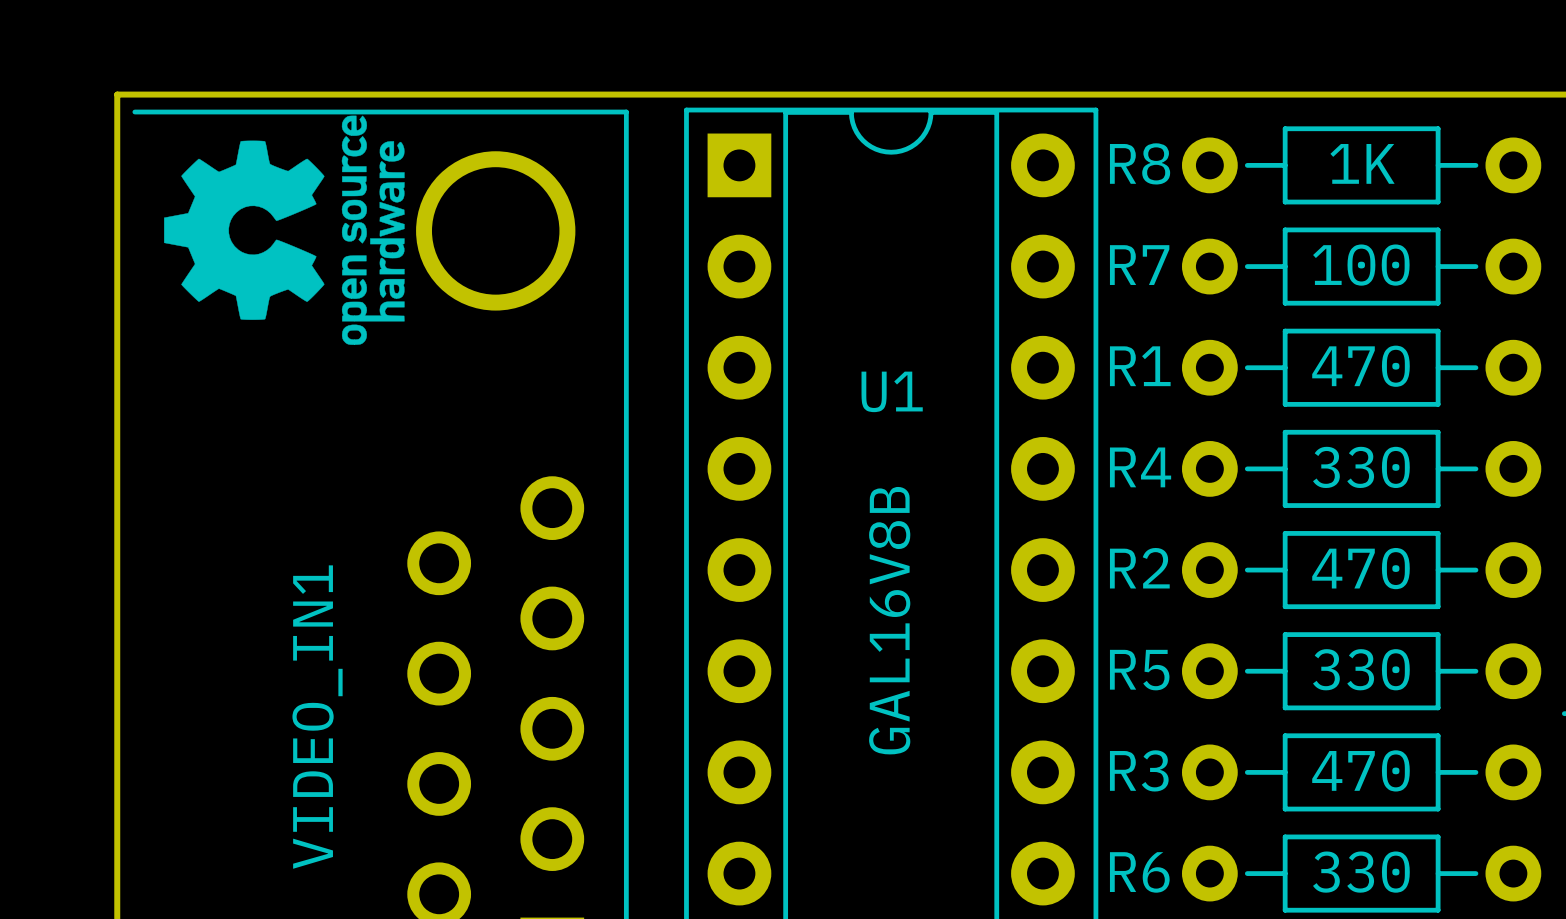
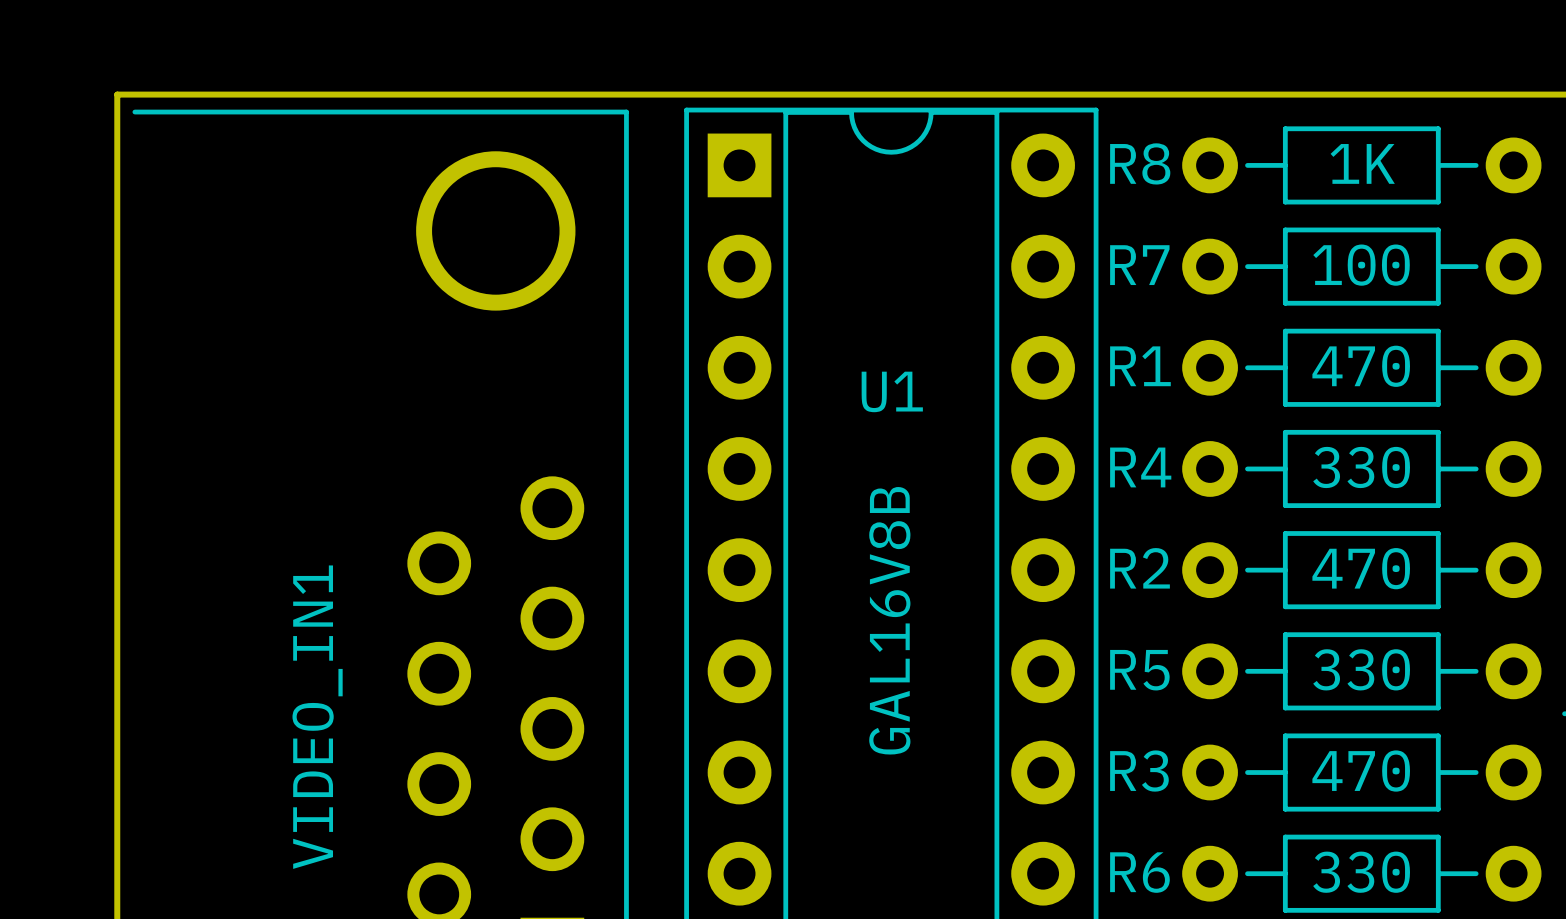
drawing: [164, 115, 405, 345] -> none

